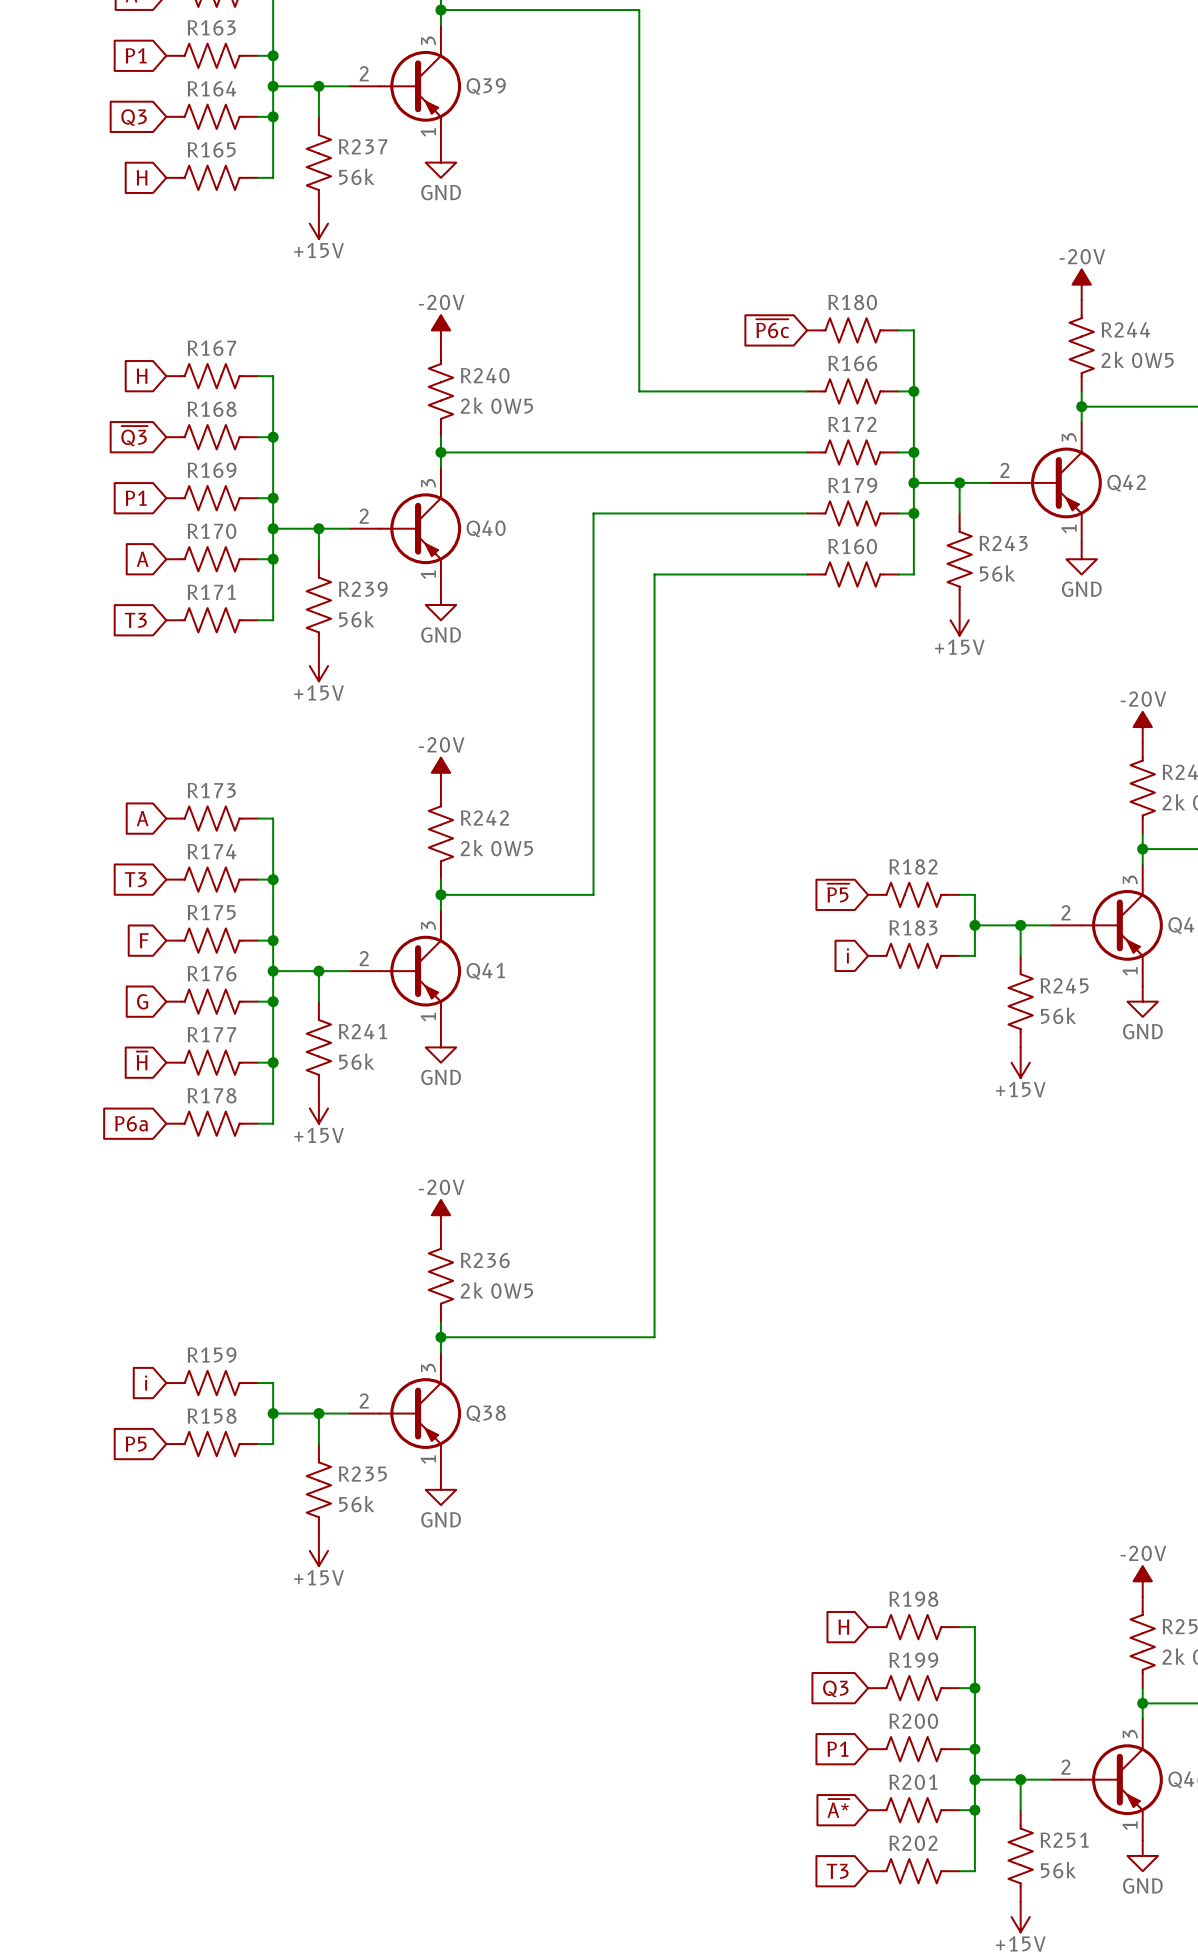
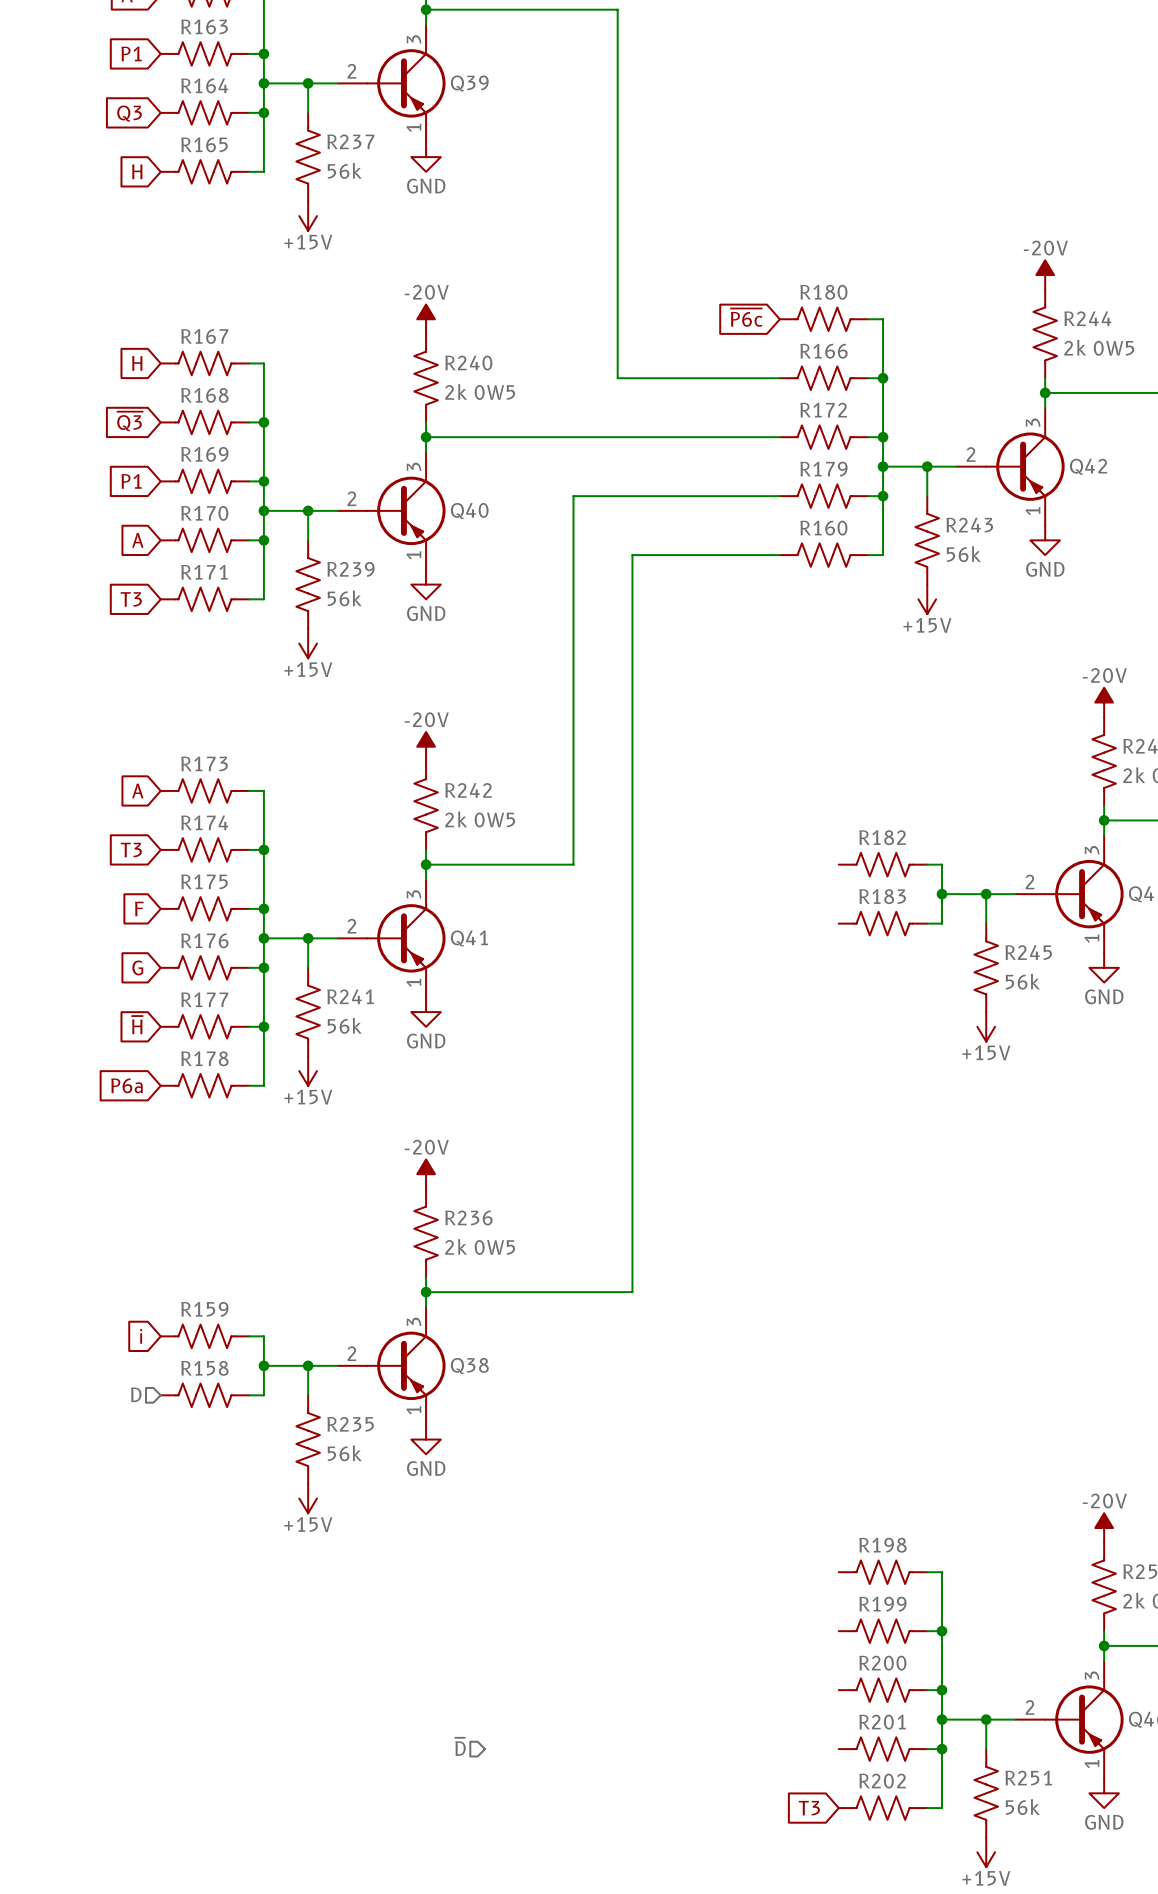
global label: ~{P5} (838, 893) -> none
global label: i (847, 955) -> none
hierarchical label: none -> D (136, 1394)
global label: P5 (136, 1444) -> none
global label: H (843, 1627) -> none
global label: Q3 (835, 1688) -> none
global label: P1 (837, 1749) -> none
hierarchical label: none -> ~{D} (460, 1746)
global label: ~{A*} (838, 1808) -> none

